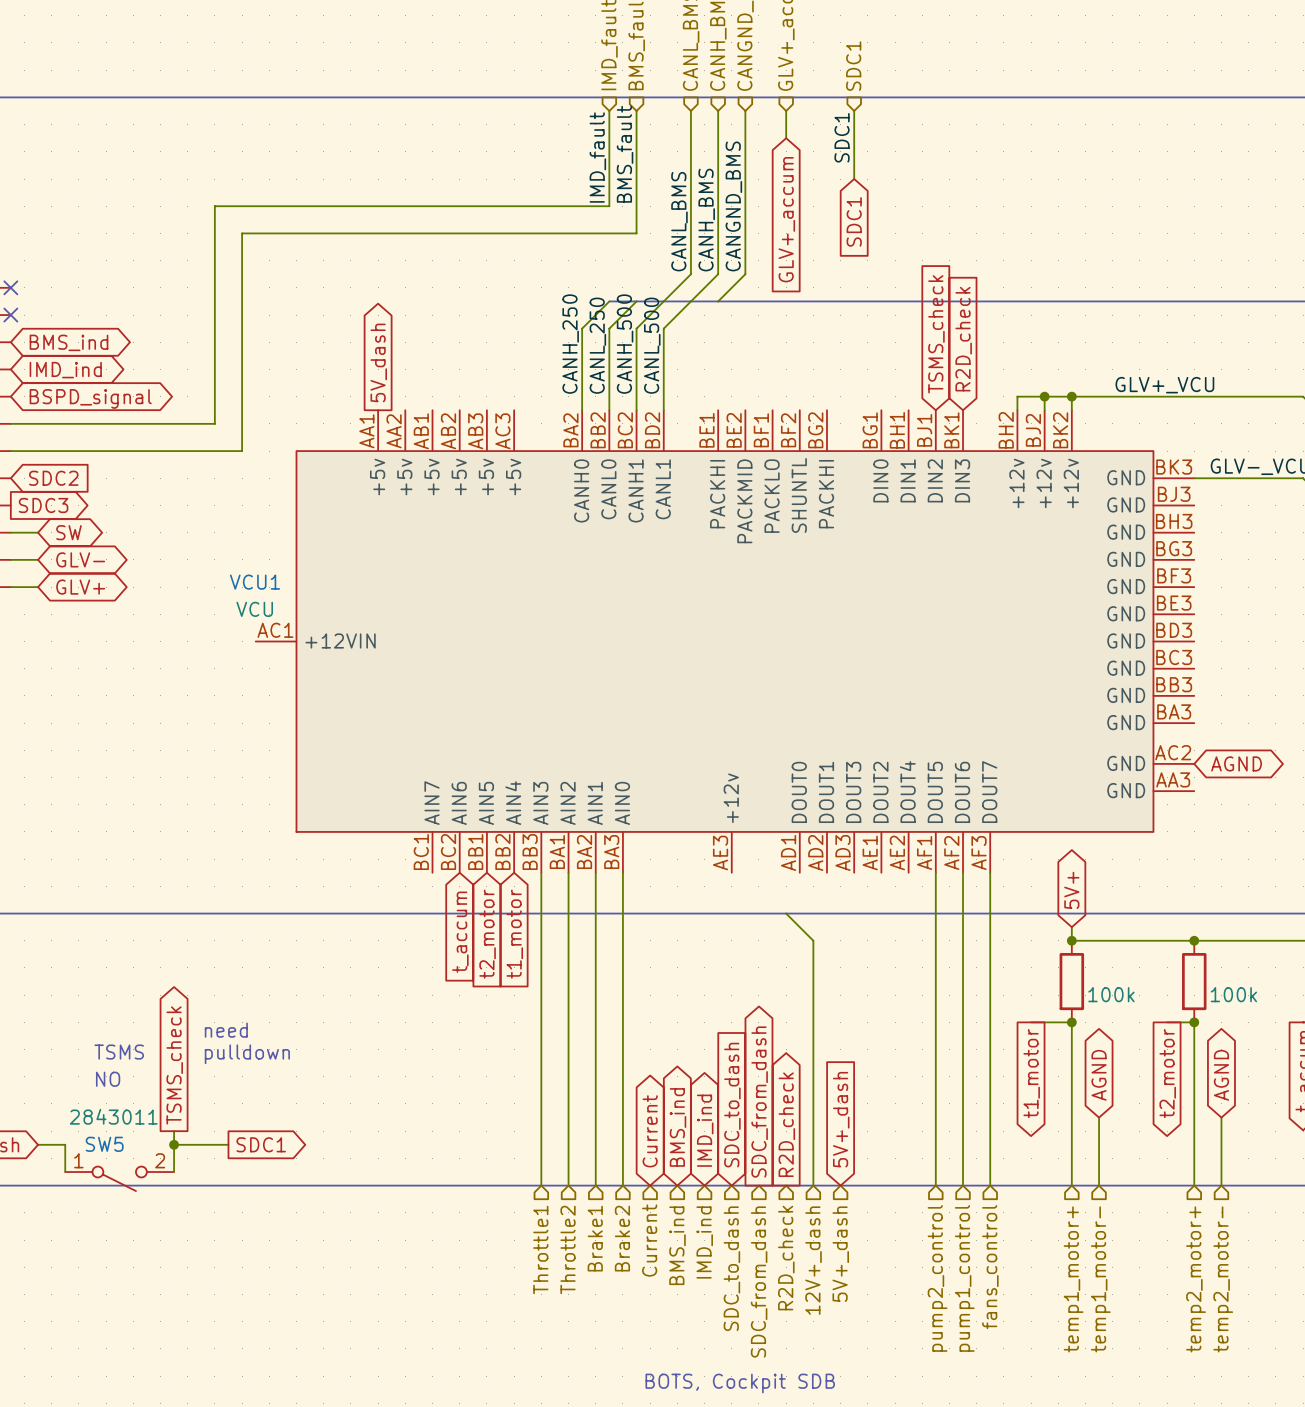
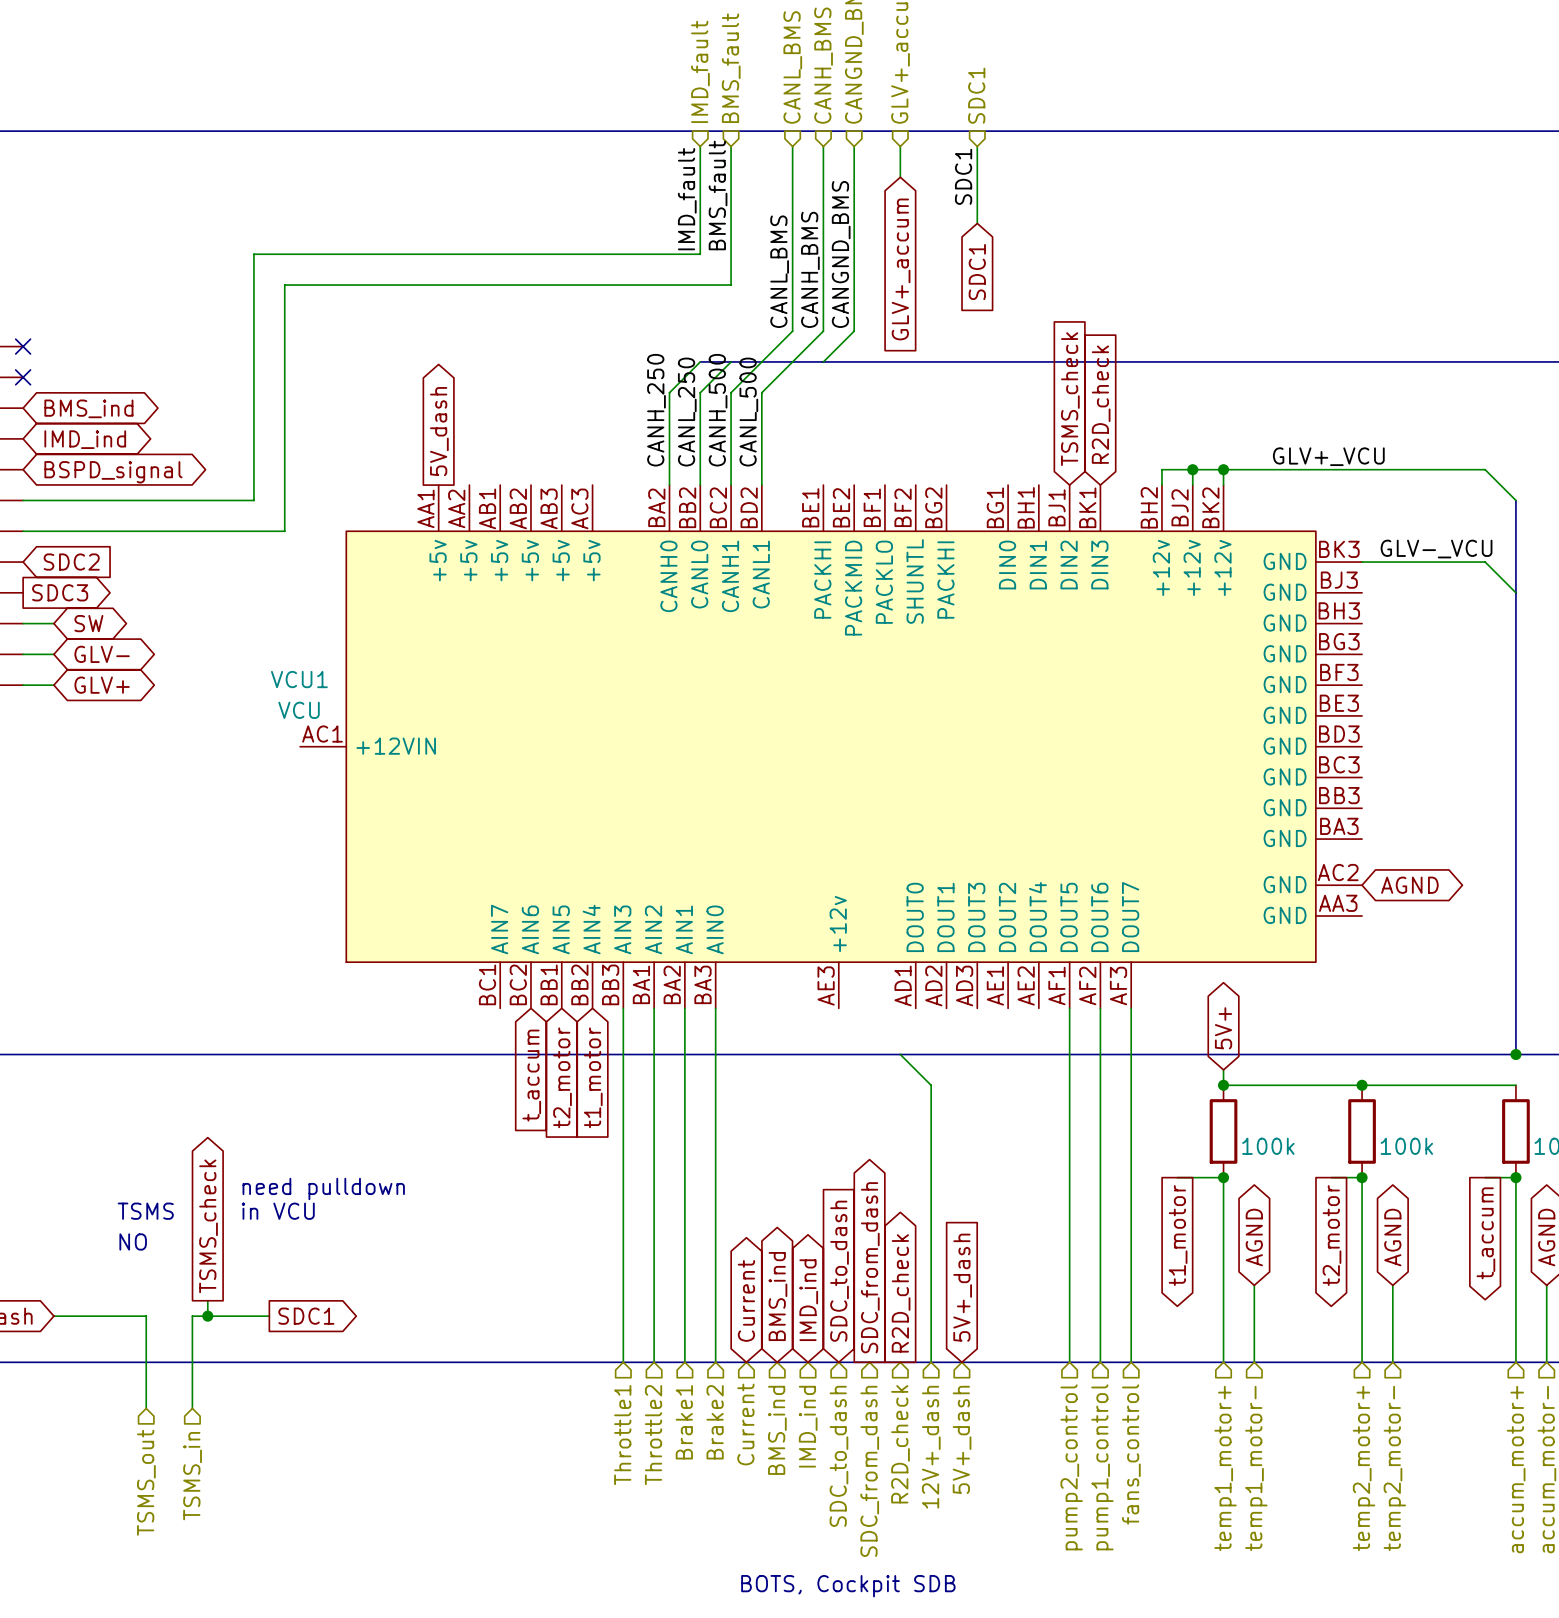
text: need (226, 1030) -> need pulldown (323, 1188)
text: pulldown (247, 1054) -> in VCU (278, 1211)
wire: (65, 1144) (65, 1172) -> (84, 1316) (146, 1316) (146, 1408)
wire: (174, 1144) (174, 1172) -> (207, 1316) (192, 1316) (192, 1408)
SW5: 2843011 (119, 1178) -> none
hierarchical label: none -> TSMS_in (192, 1476)
hierarchical label: none -> TSMS_out (146, 1482)

